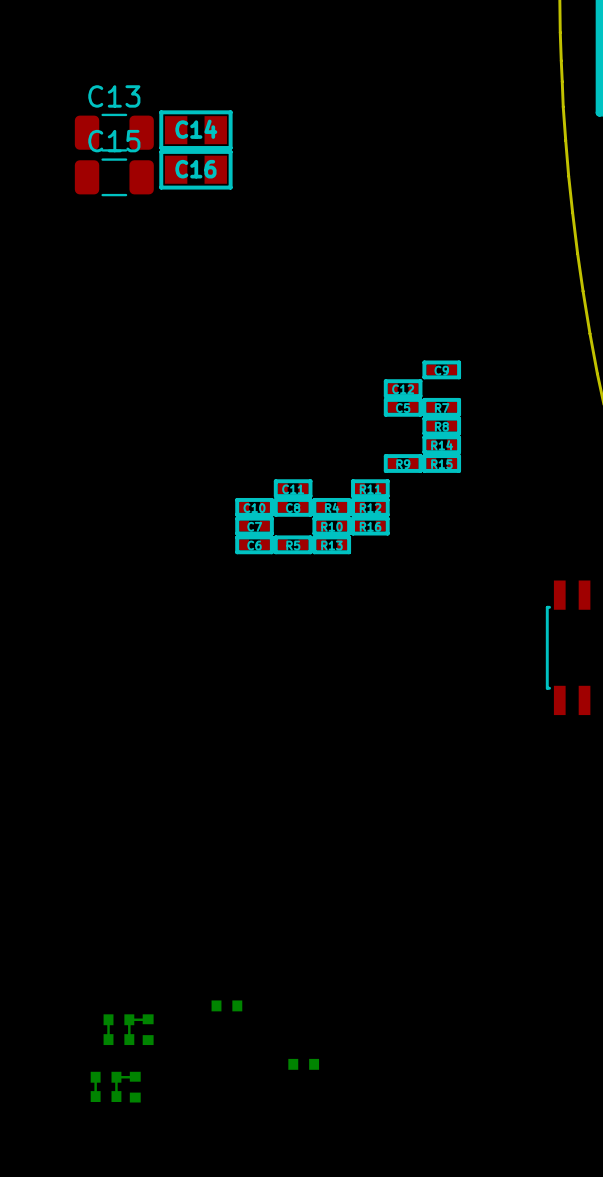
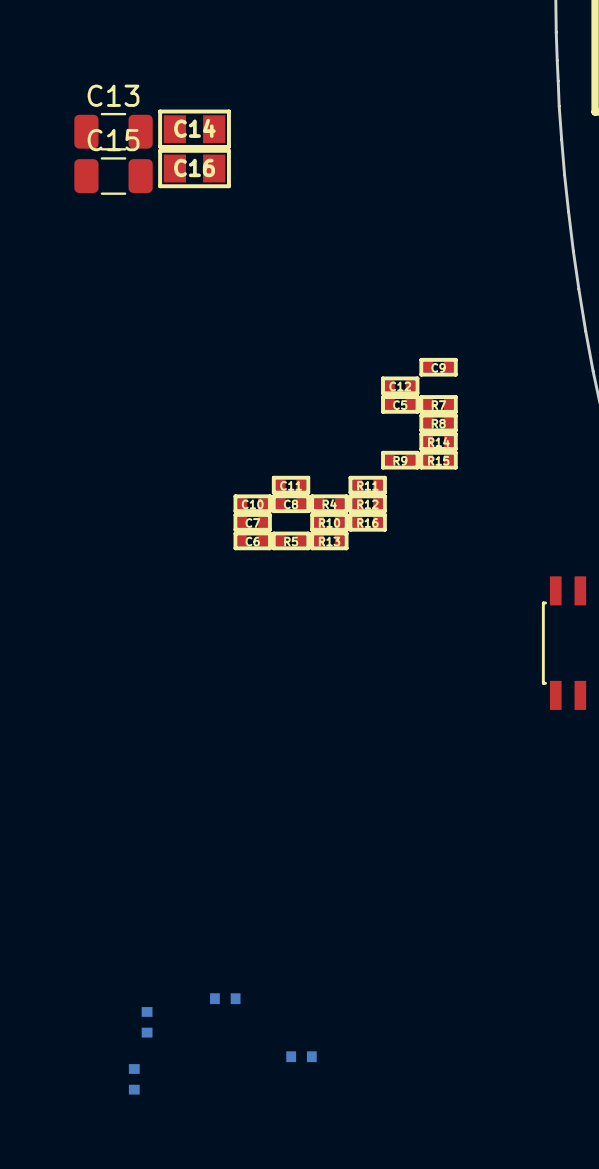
bottom track: (108, 1019) (108, 1039) -> none
part: (118, 1019) -> none
bottom track: (148, 1019) (129, 1019) (129, 1039) -> none
part: (118, 1039) -> none
bottom track: (135, 1076) (116, 1077) (116, 1096) -> none
bottom track: (95, 1077) (95, 1096) -> none
part: (106, 1077) -> none
part: (106, 1096) -> none

